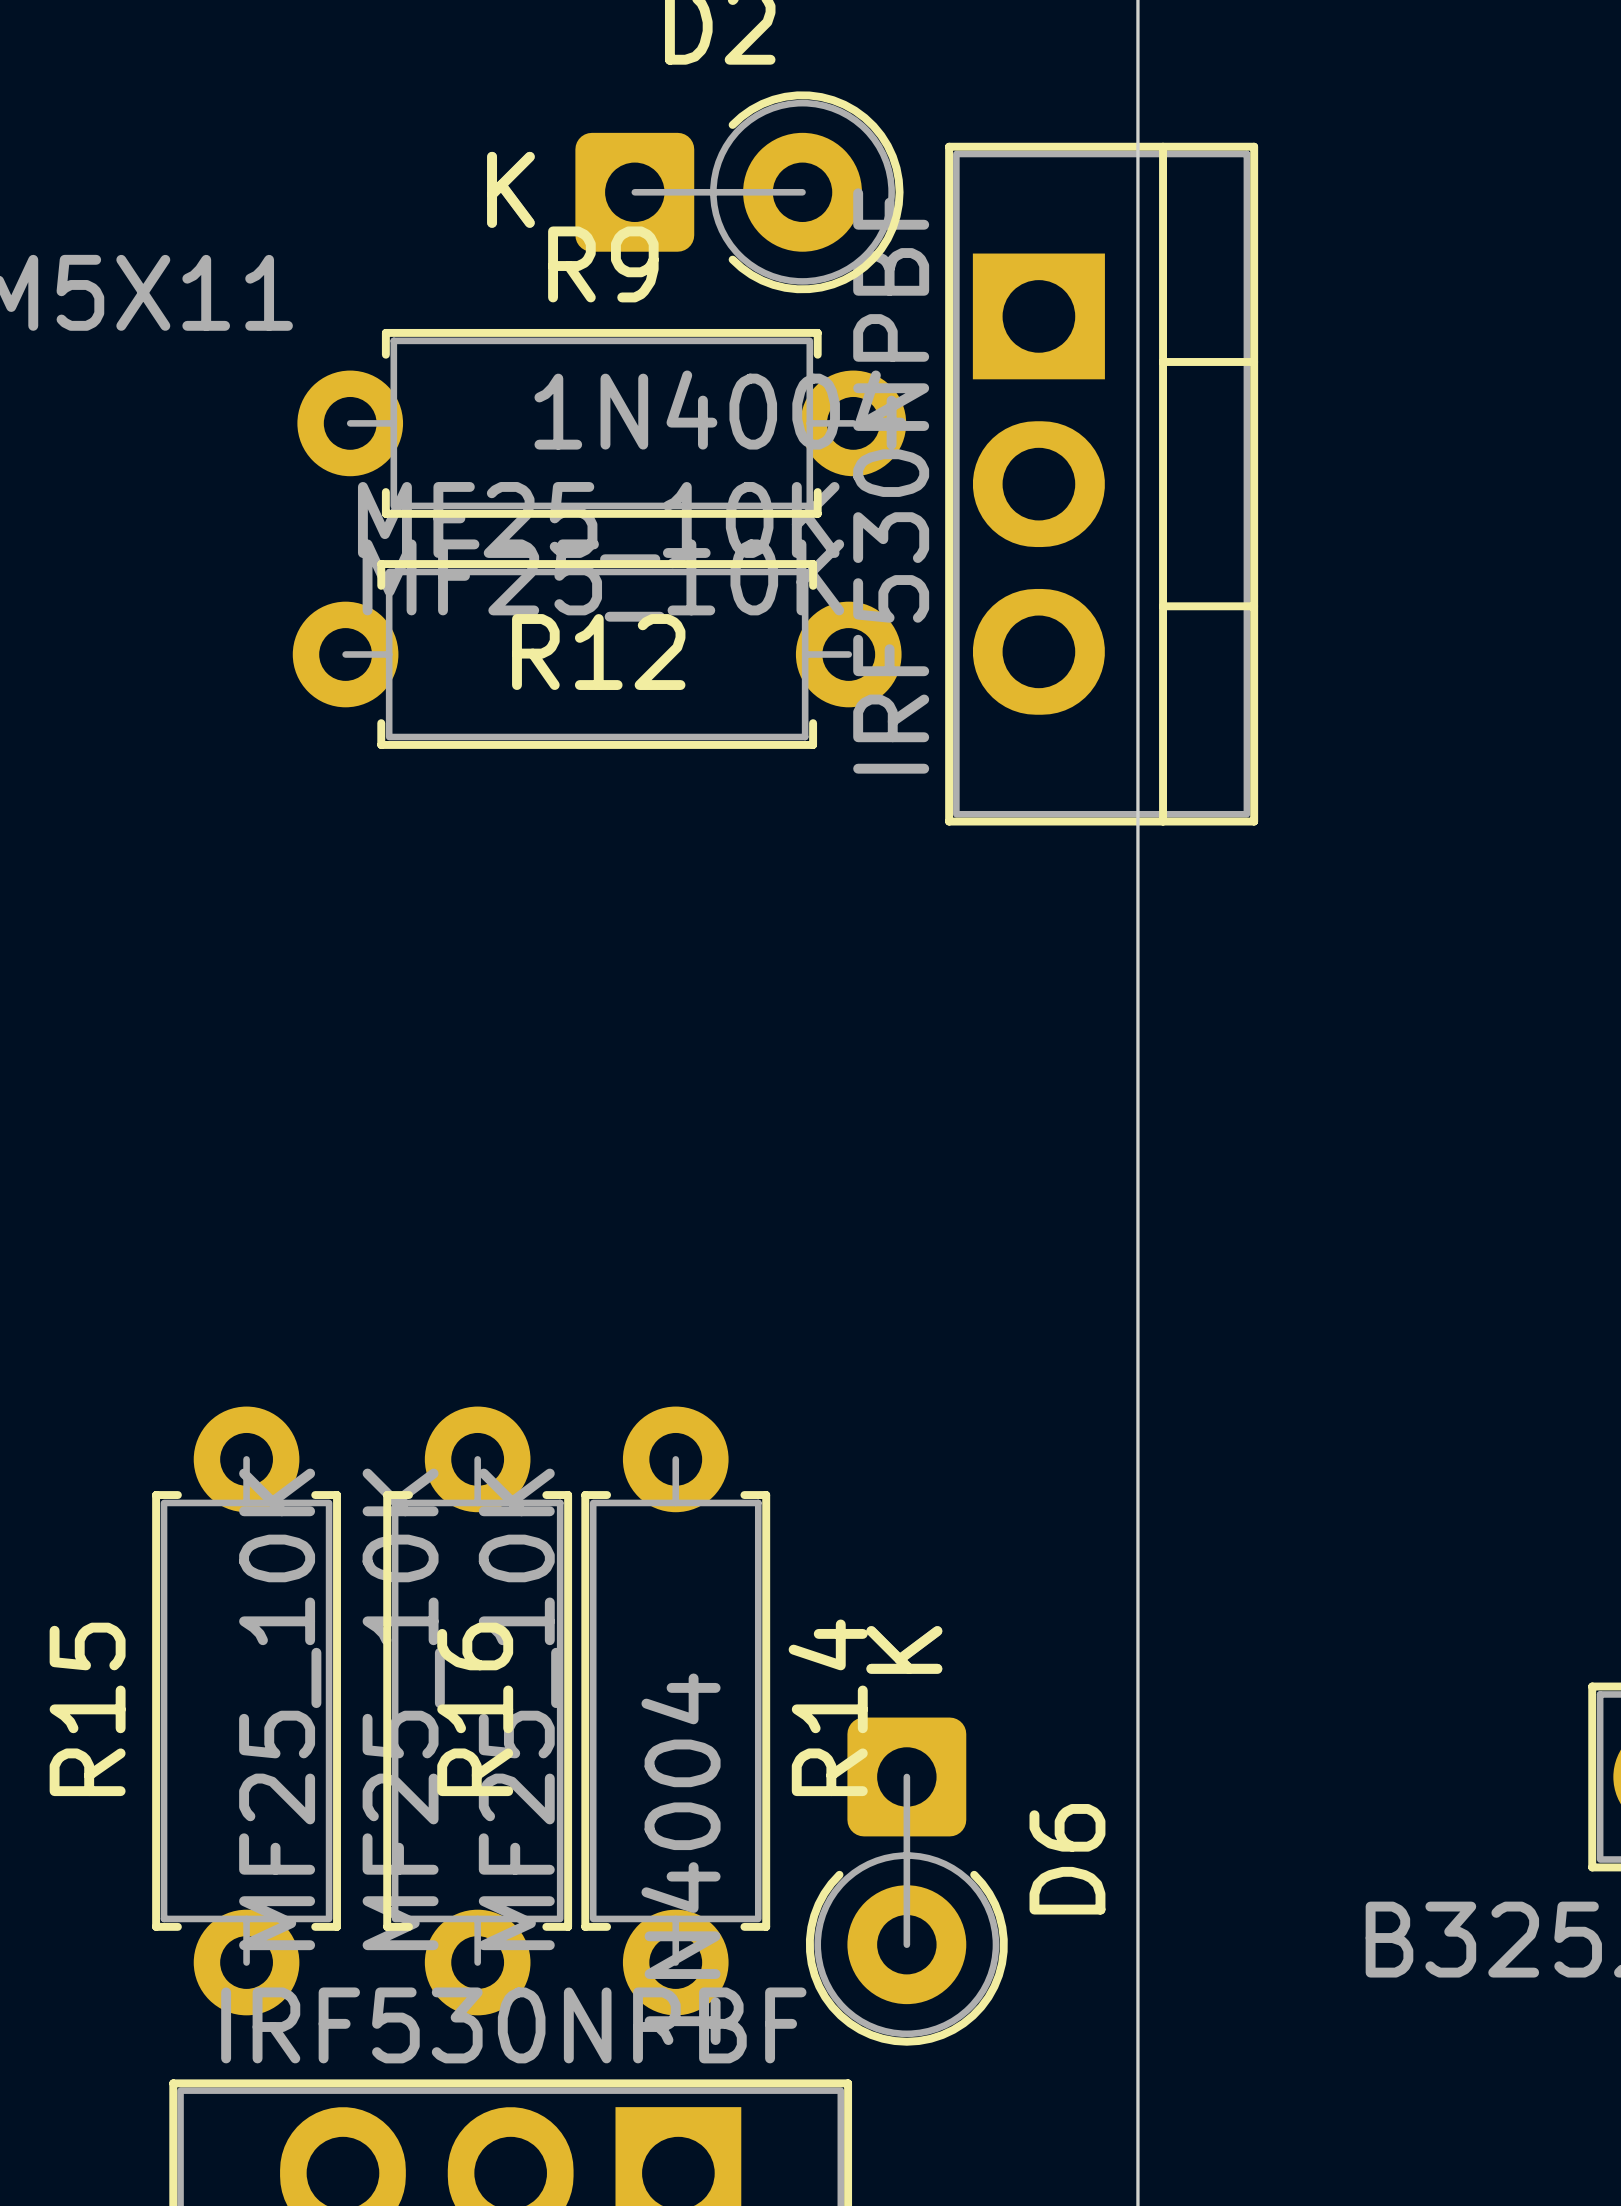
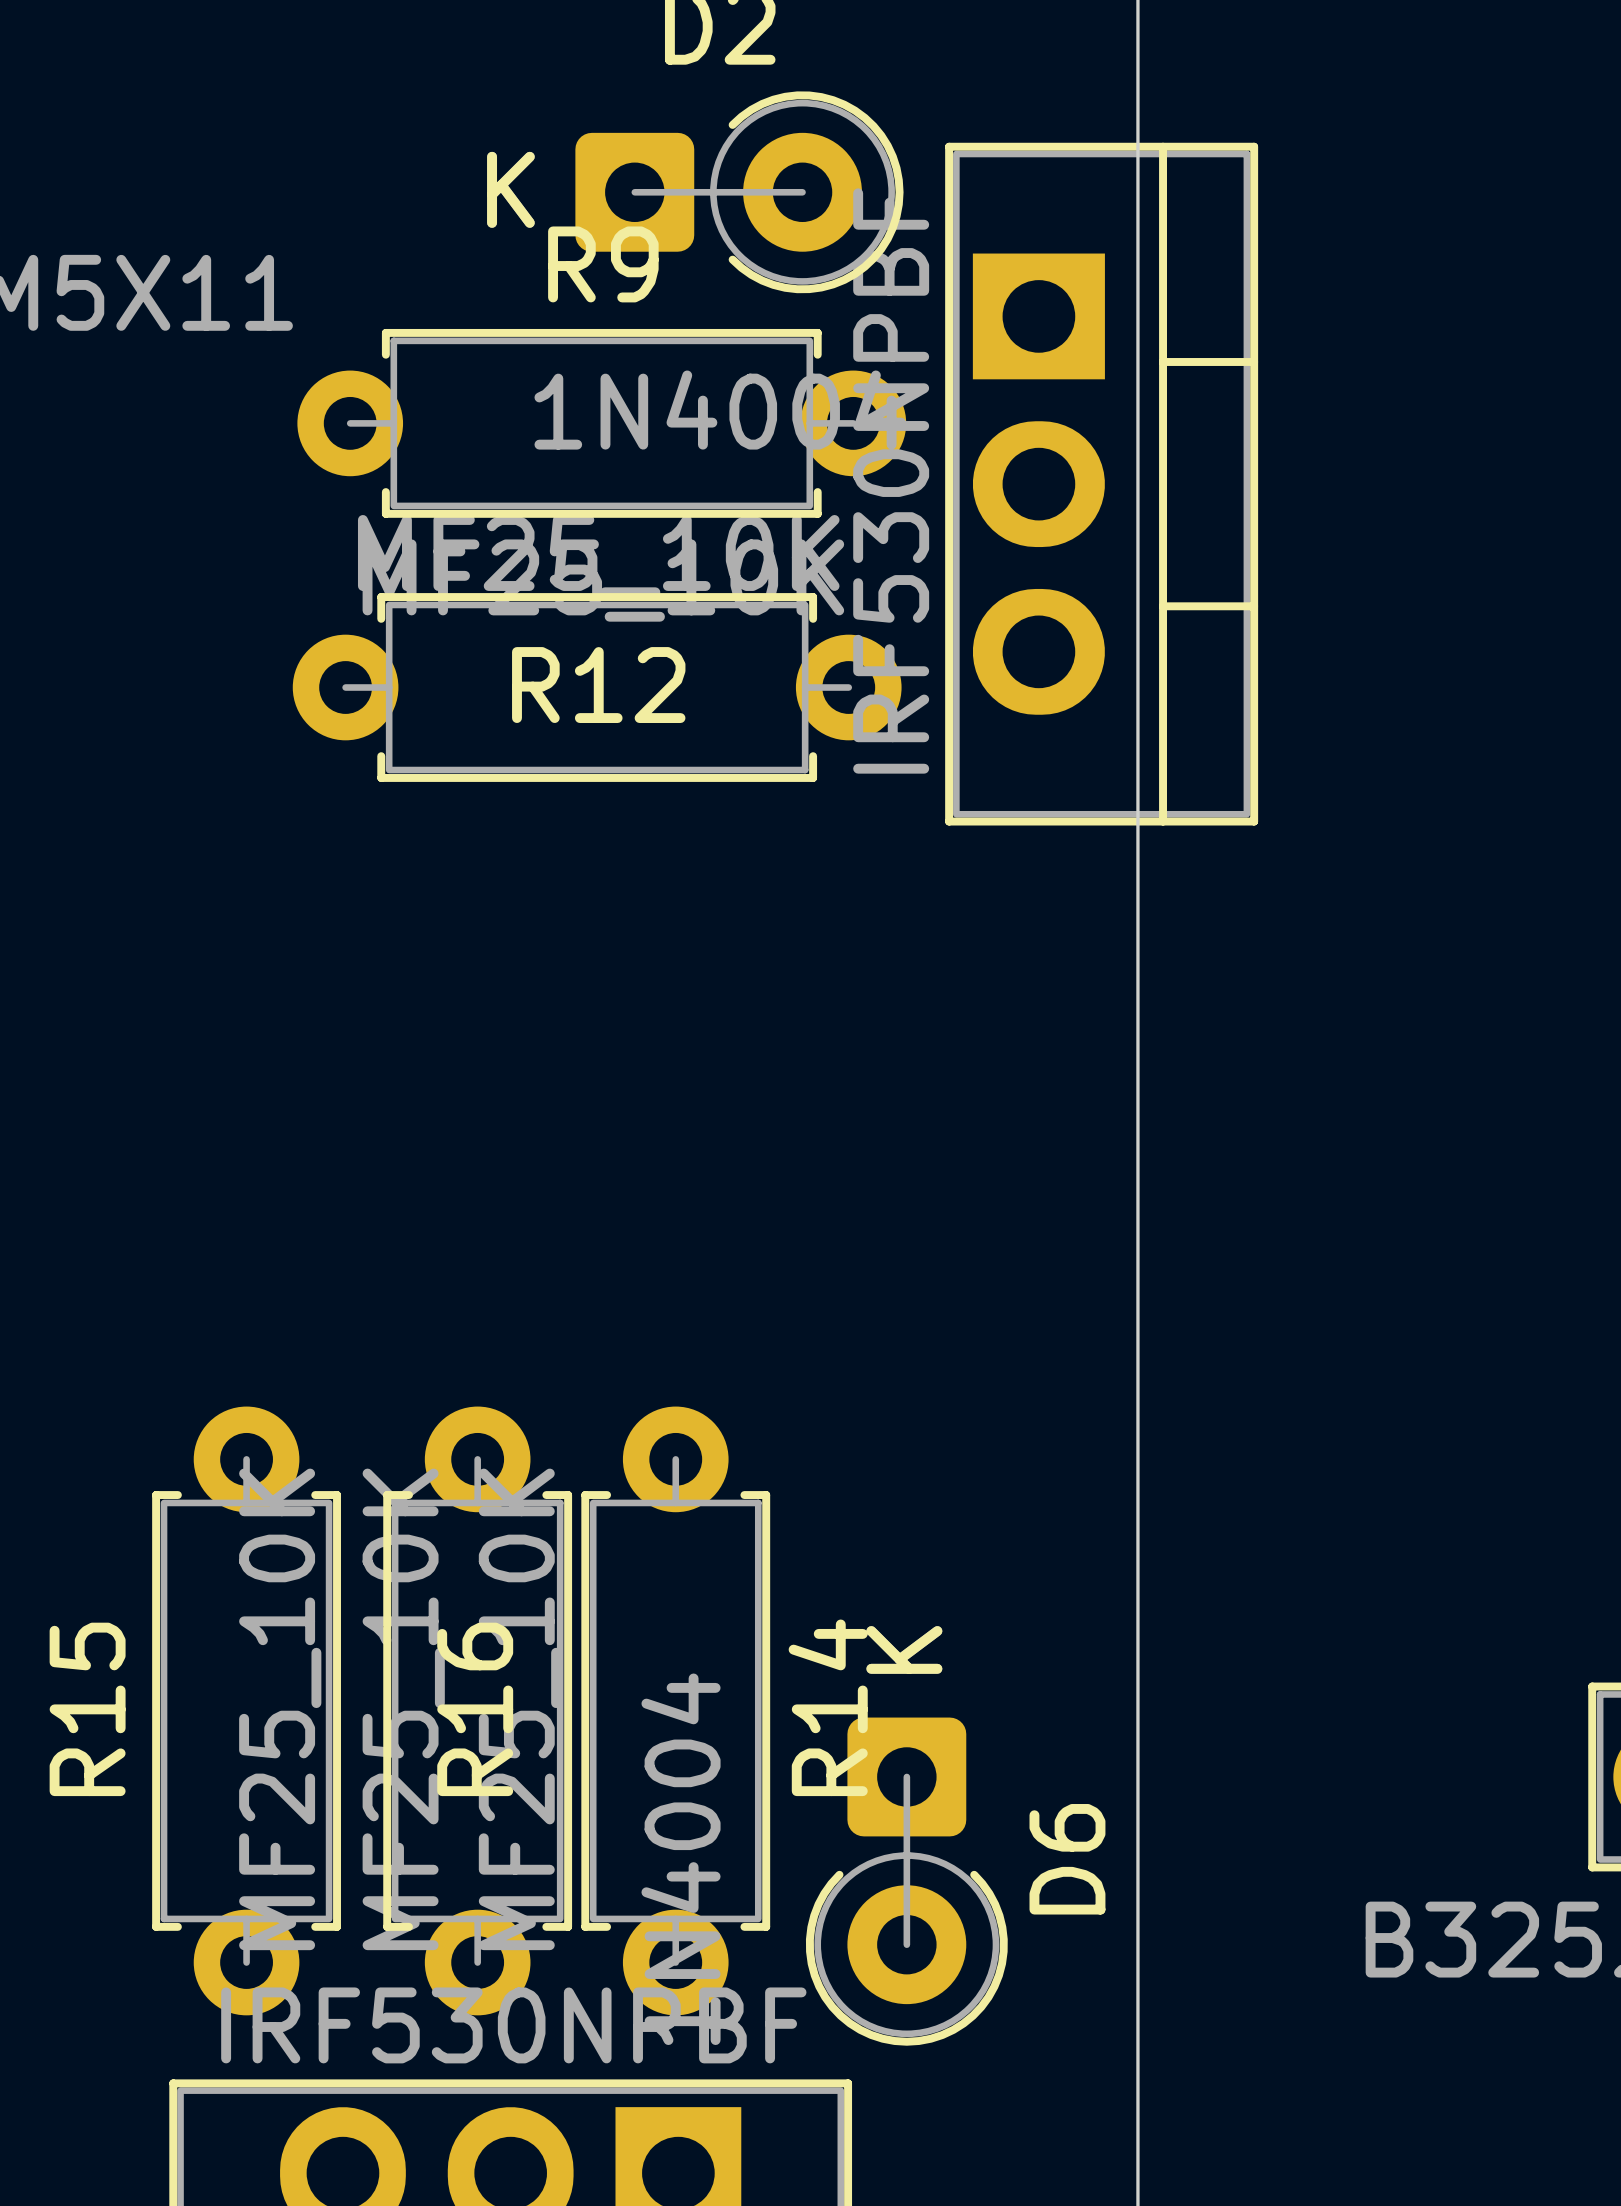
R12 position: (597, 654) -> (597, 687)

